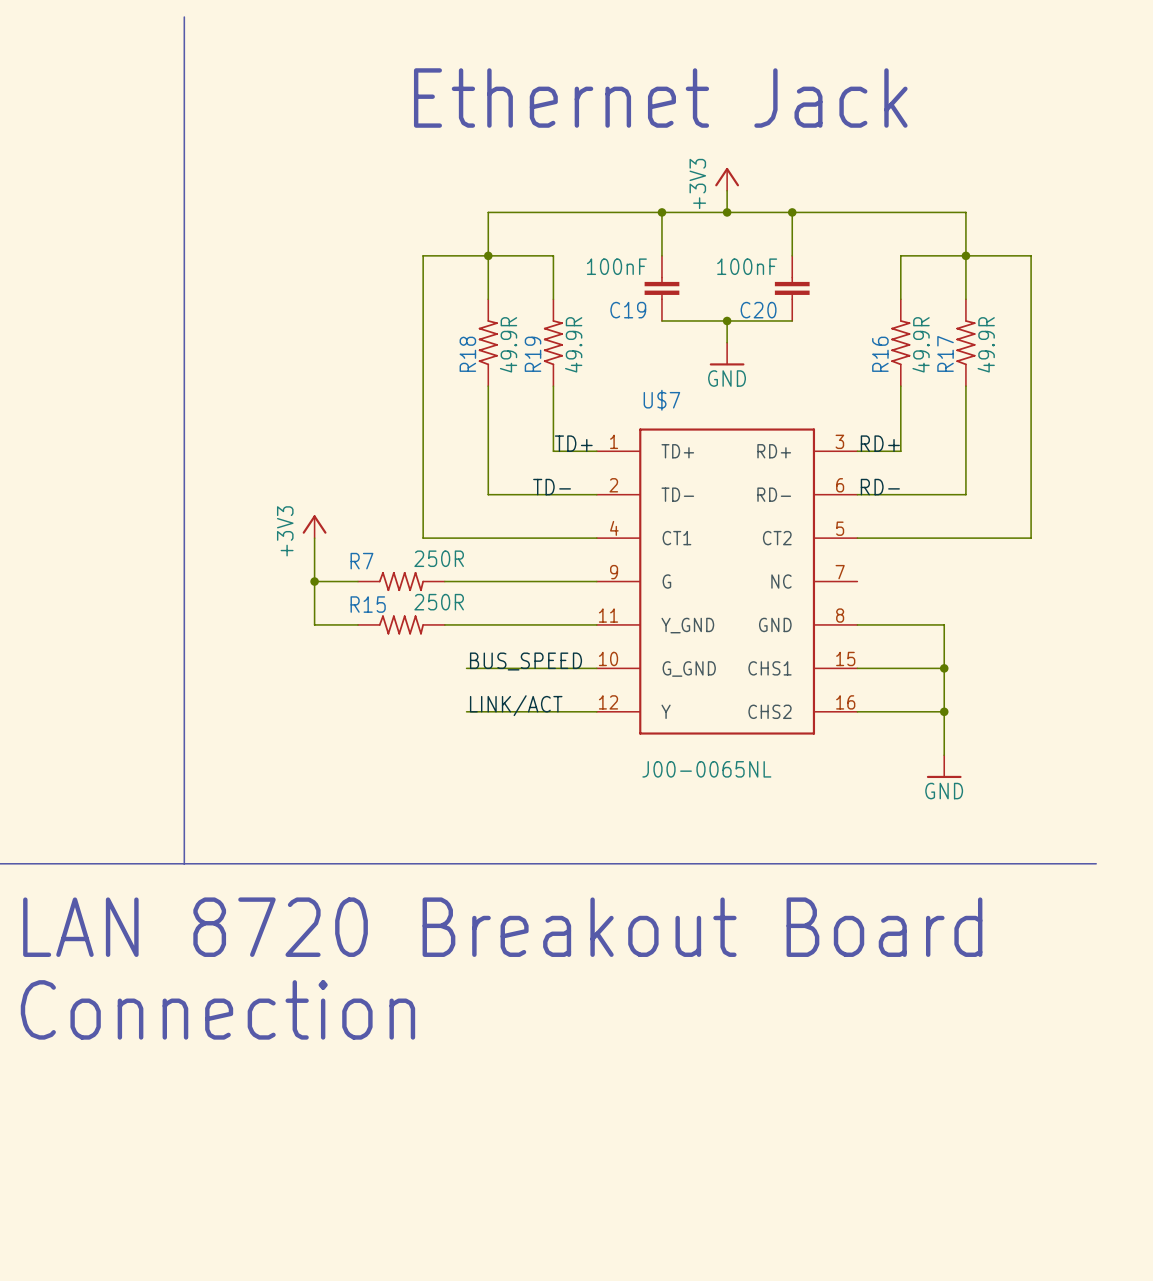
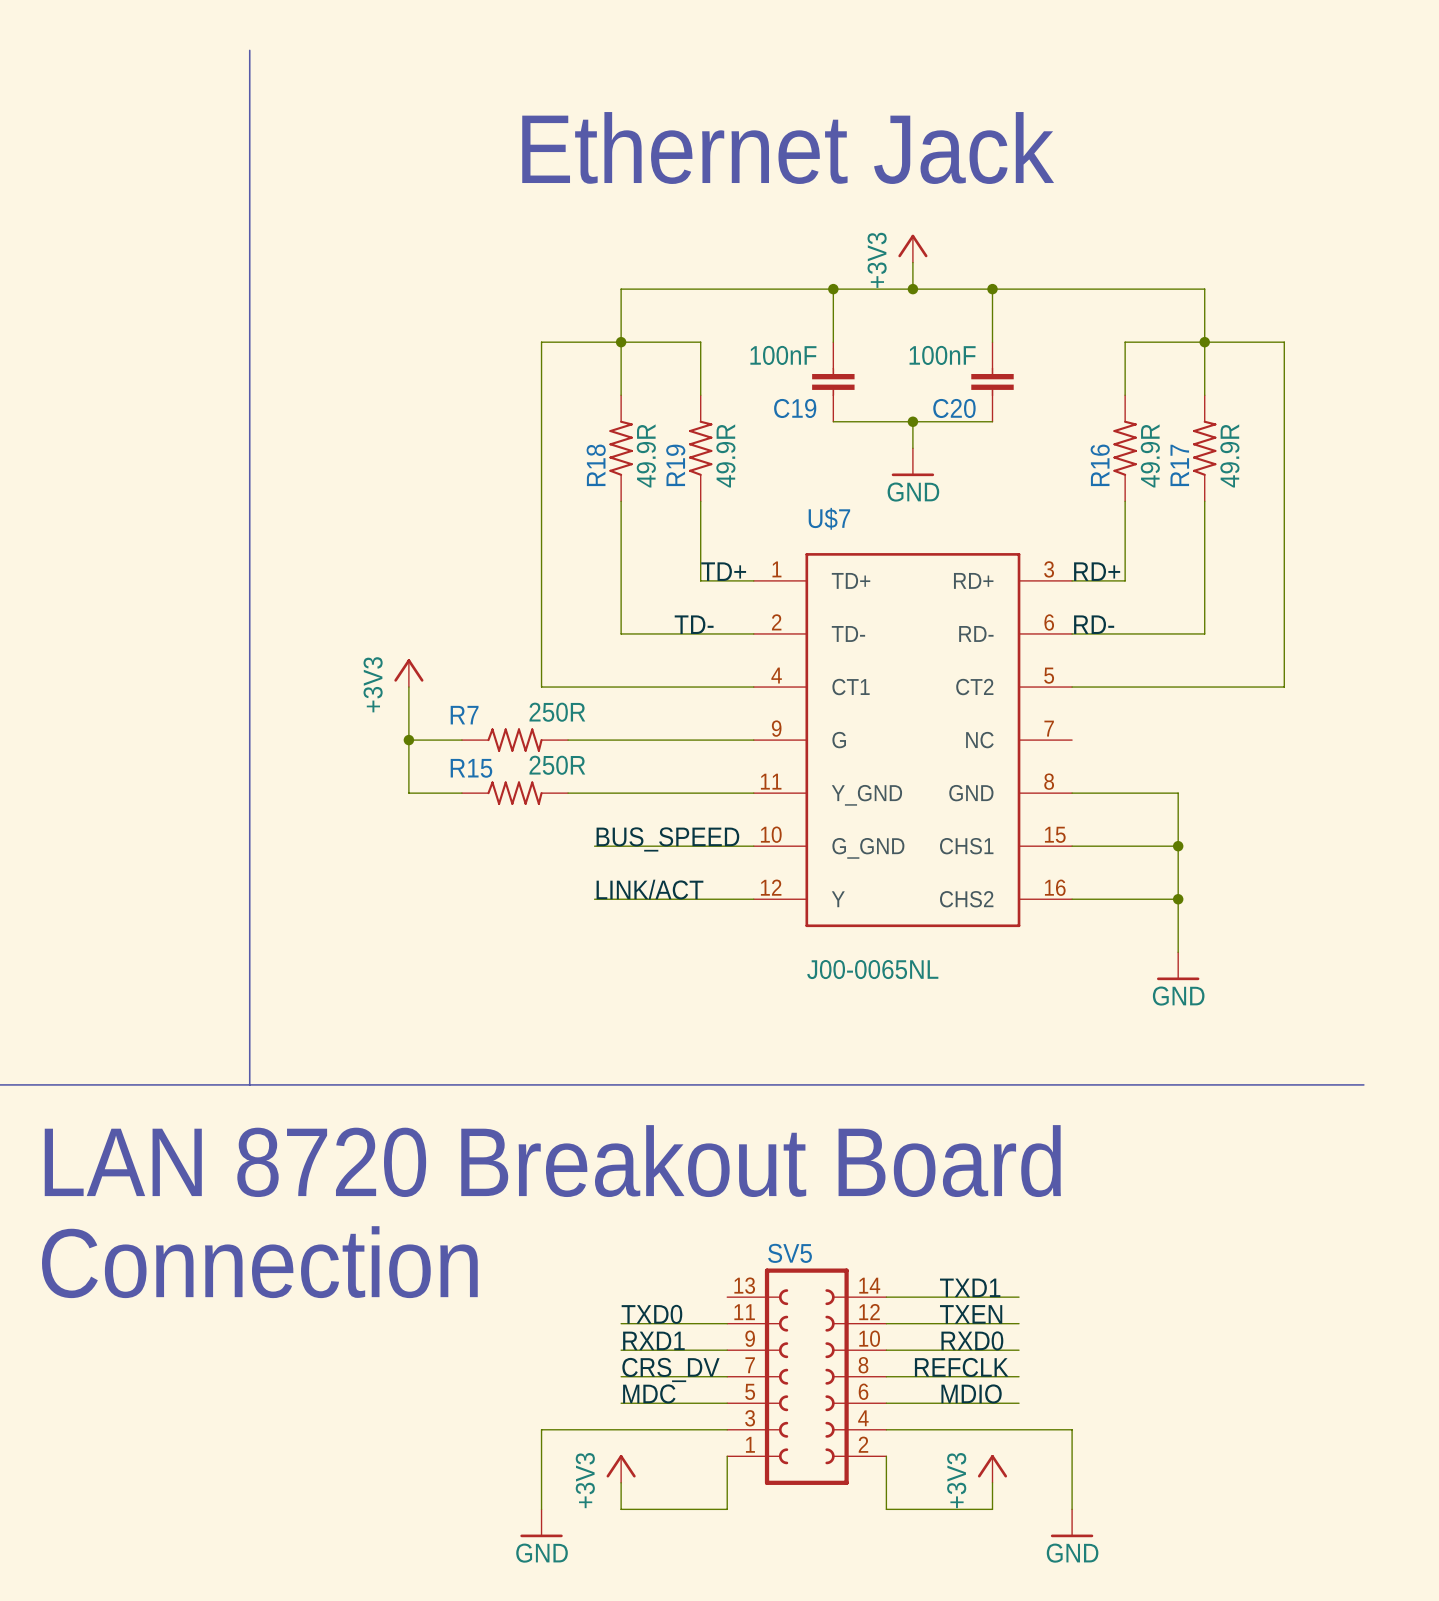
label: none -> TXD1 (970, 1287)
wire: none -> (886, 1297) (1019, 1297)
label: none -> TXD0 (651, 1314)
label: none -> TXEN (971, 1314)
wire: none -> (621, 1323) (727, 1323)
wire: none -> (886, 1323) (1019, 1323)
label: none -> RXD1 (653, 1340)
label: none -> RXD0 (972, 1340)
wire: none -> (621, 1350) (727, 1350)
wire: none -> (886, 1350) (1019, 1350)
label: none -> CRS_DV (670, 1369)
label: none -> REFCLK (961, 1367)
wire: none -> (621, 1376) (727, 1376)
SV5: none -> (806, 1376)
wire: none -> (886, 1376) (1019, 1376)
label: none -> MDC (649, 1393)
label: none -> MDIO (971, 1393)
wire: none -> (621, 1403) (727, 1403)
wire: none -> (886, 1403) (1019, 1403)
wire: none -> (727, 1429) (541, 1429) (541, 1509)
wire: none -> (886, 1429) (1072, 1429) (1072, 1509)
wire: none -> (727, 1456) (727, 1509) (621, 1509) (621, 1482)
wire: none -> (886, 1456) (886, 1509) (992, 1509) (992, 1482)
power symbol: none -> +3V3 (621, 1468)
power symbol: none -> +3V3 (992, 1468)
power symbol: none -> GND (541, 1523)
power symbol: none -> GND (1072, 1523)

